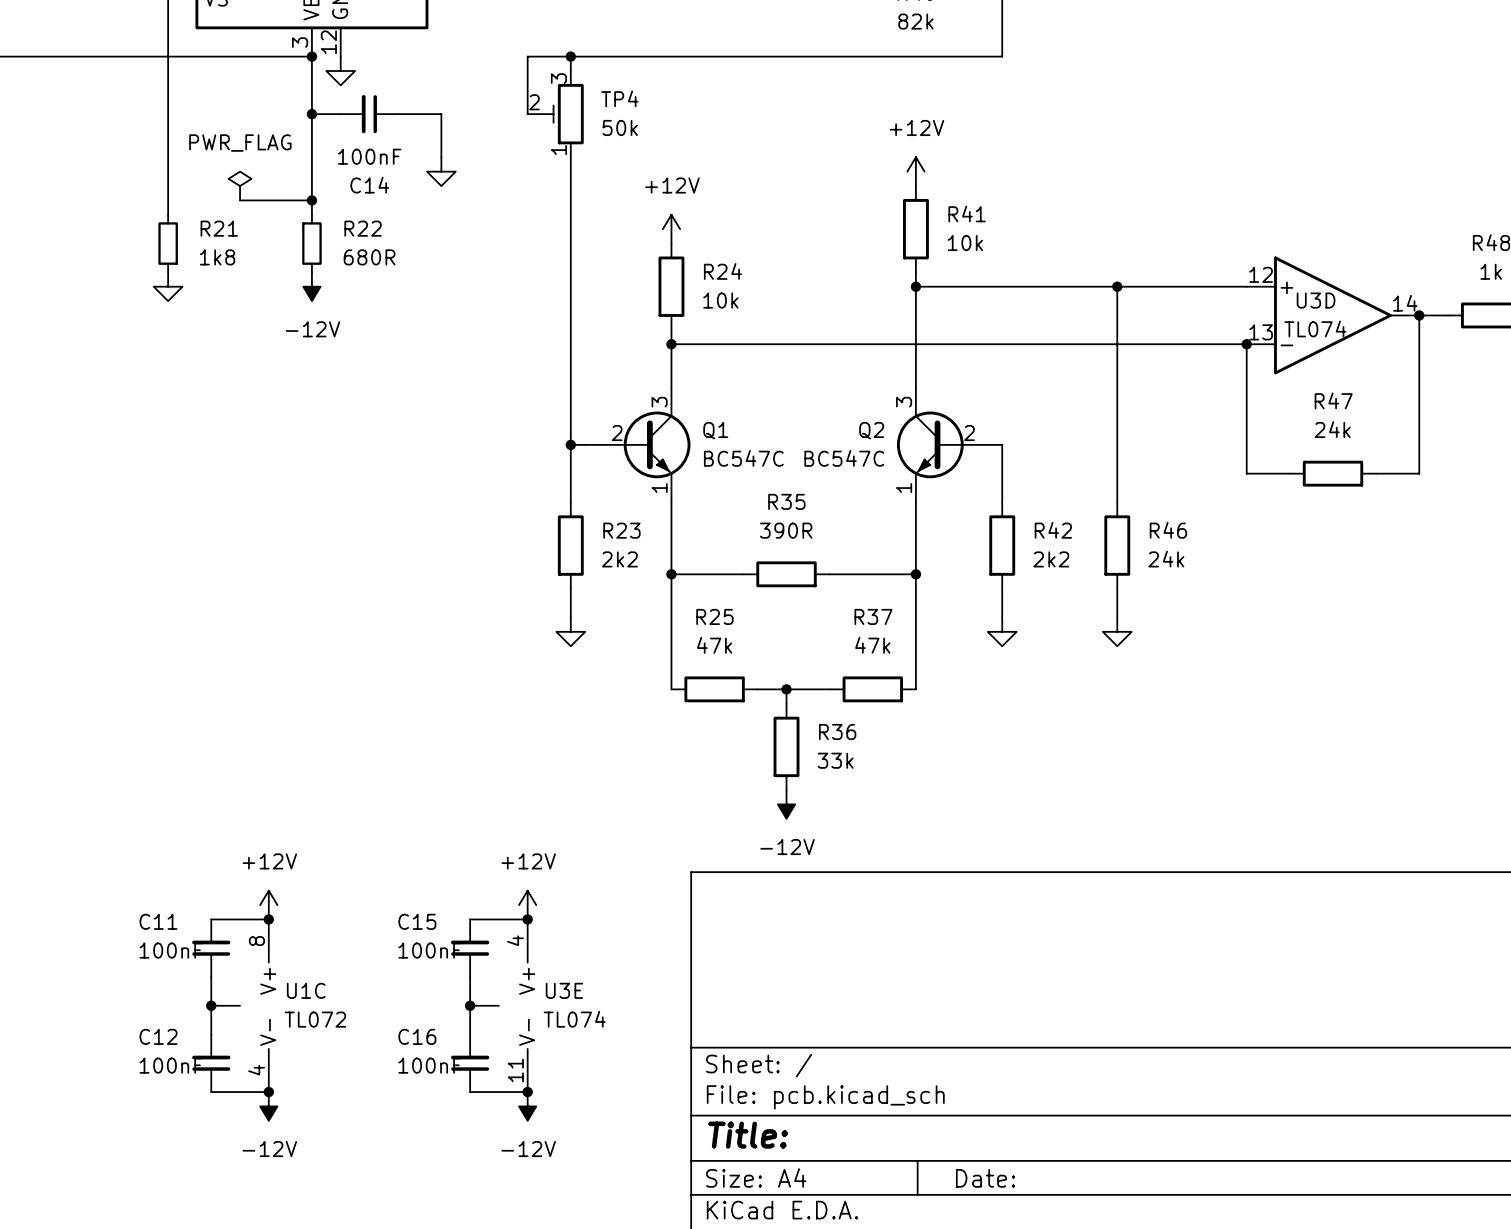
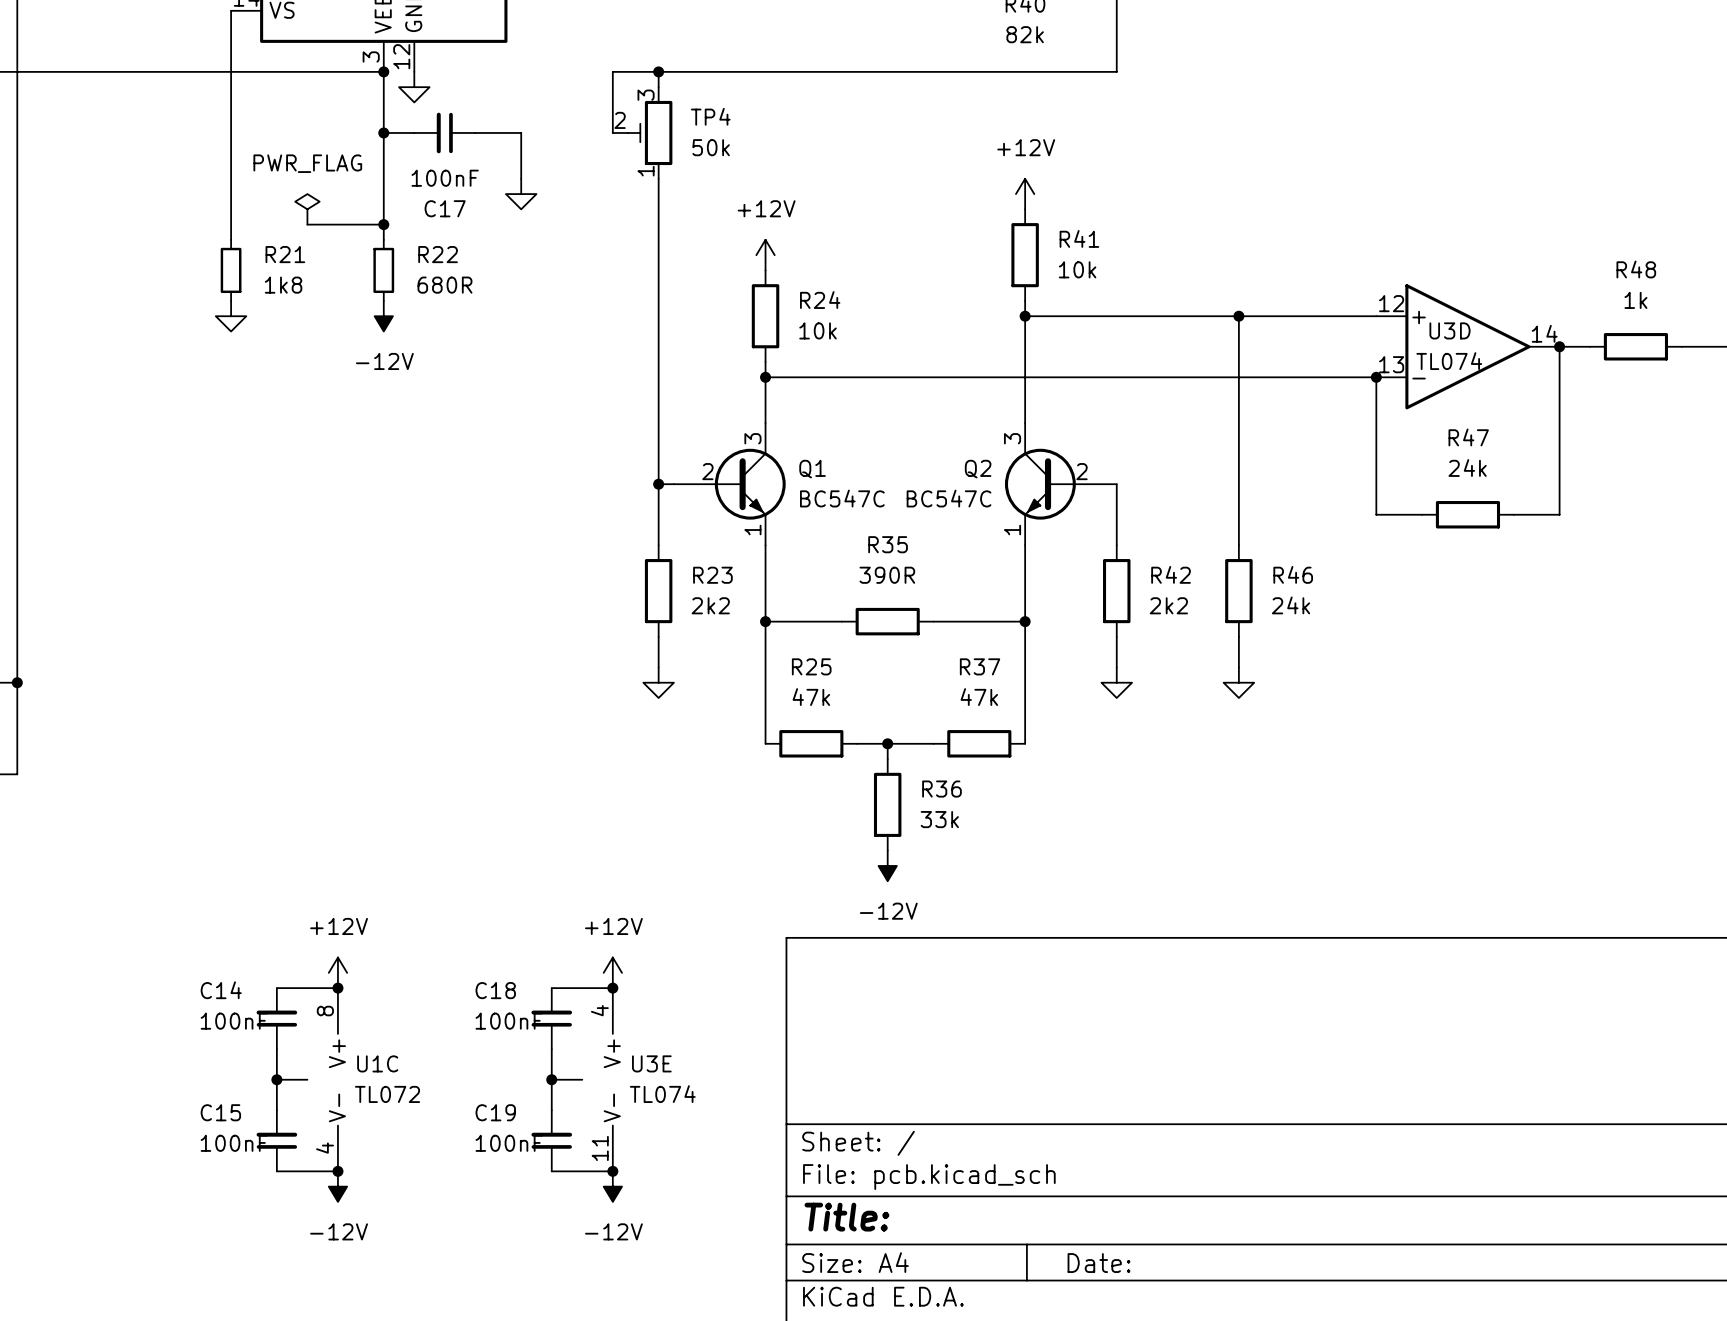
C14 name: C14 (369, 185) -> C17 (445, 208)
C11 name: C11 (158, 921) -> C14 (221, 990)
C15 name: C15 (417, 921) -> C18 (495, 990)
C12 name: C12 (158, 1036) -> C15 (220, 1112)
C16 name: C16 (417, 1036) -> C19 (495, 1112)

